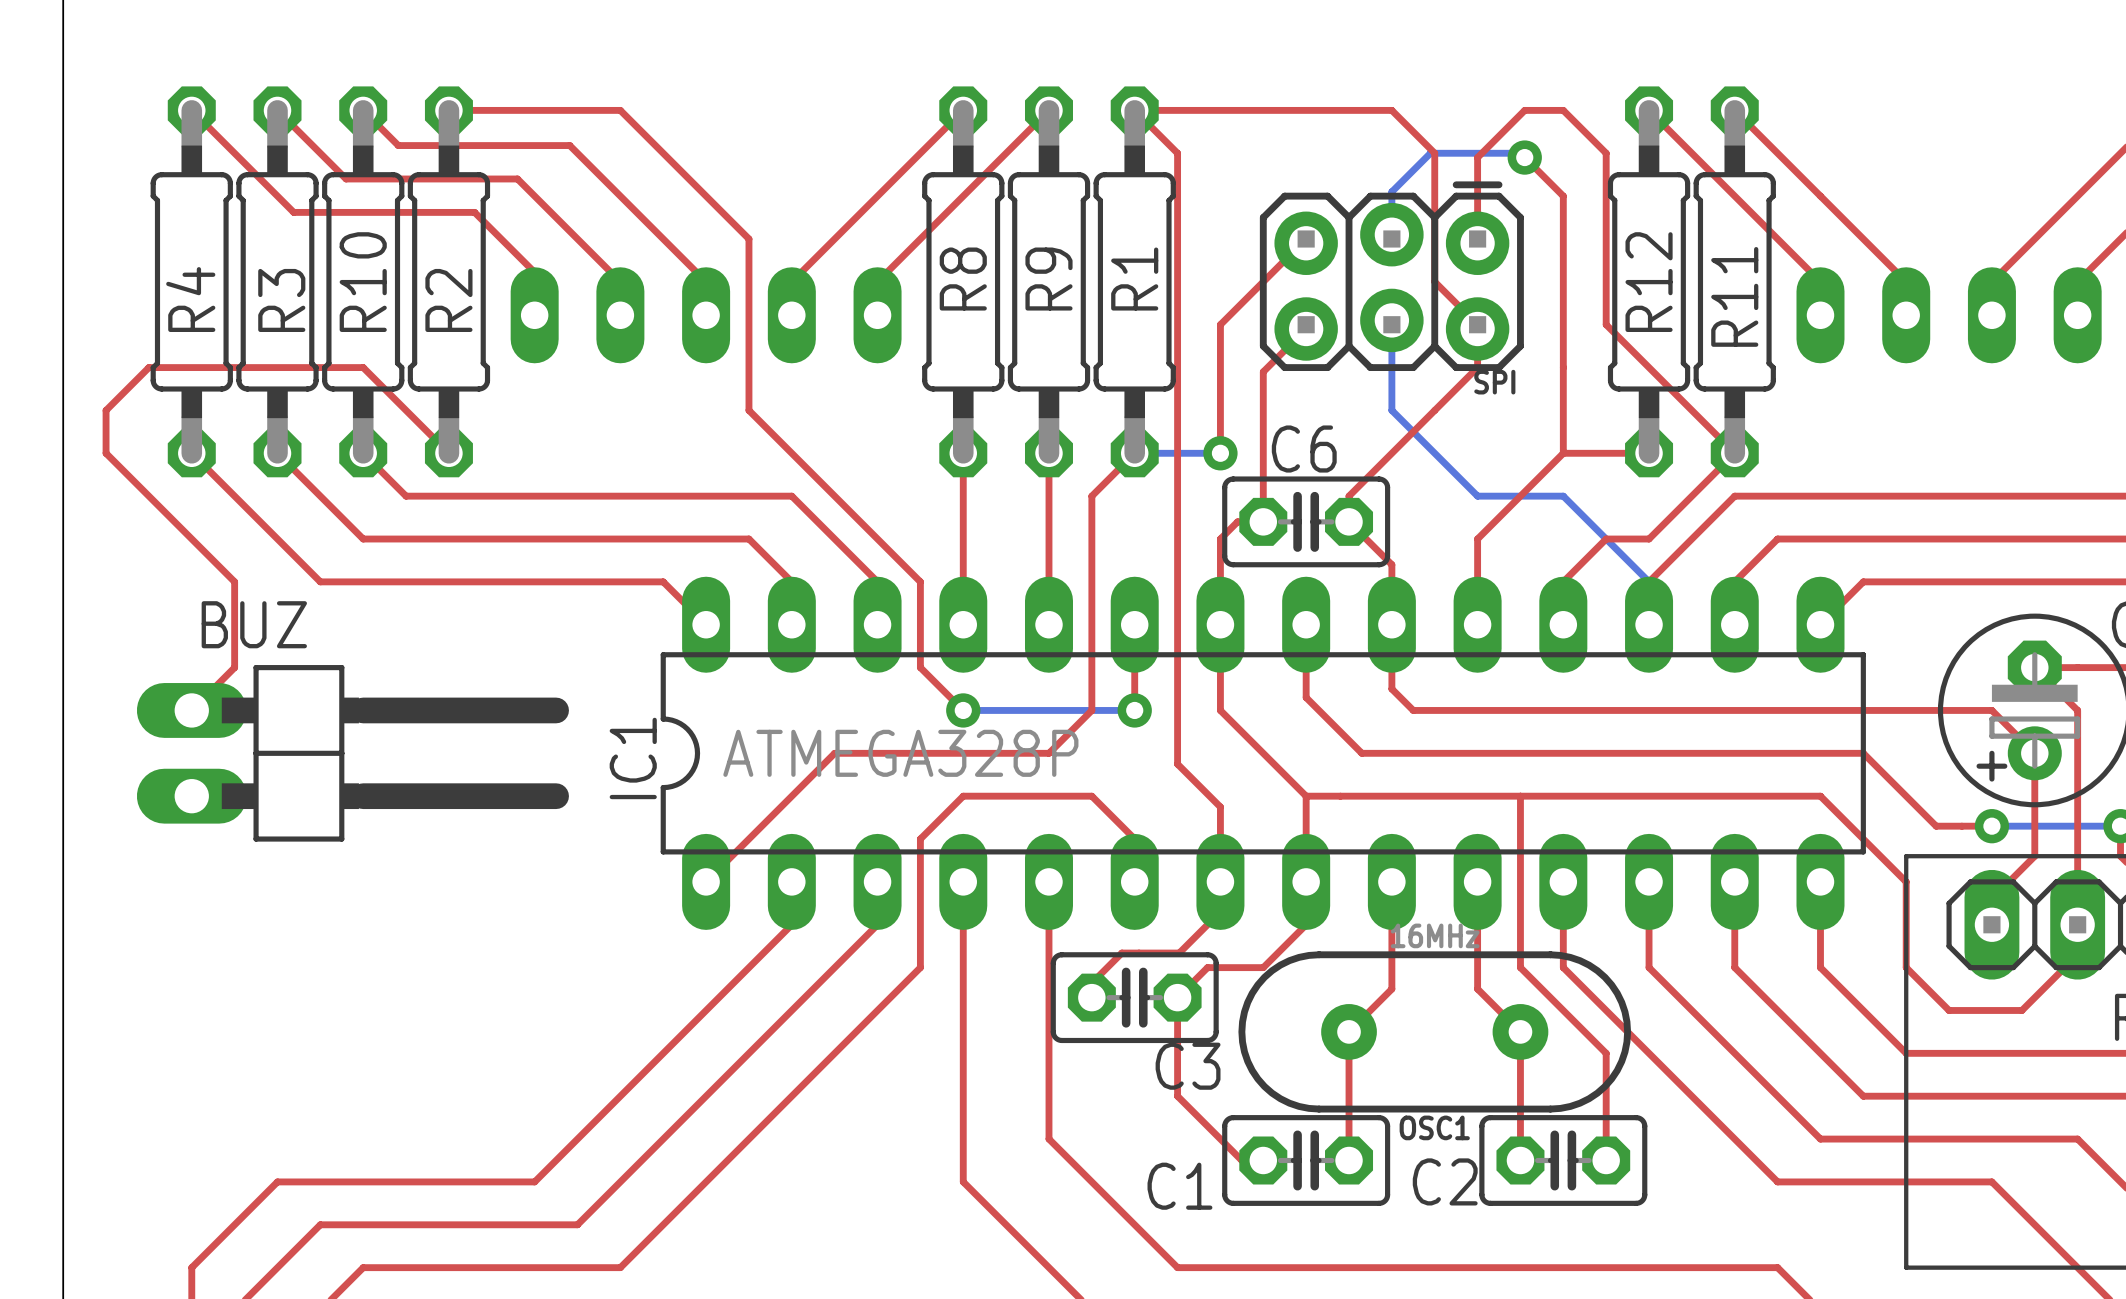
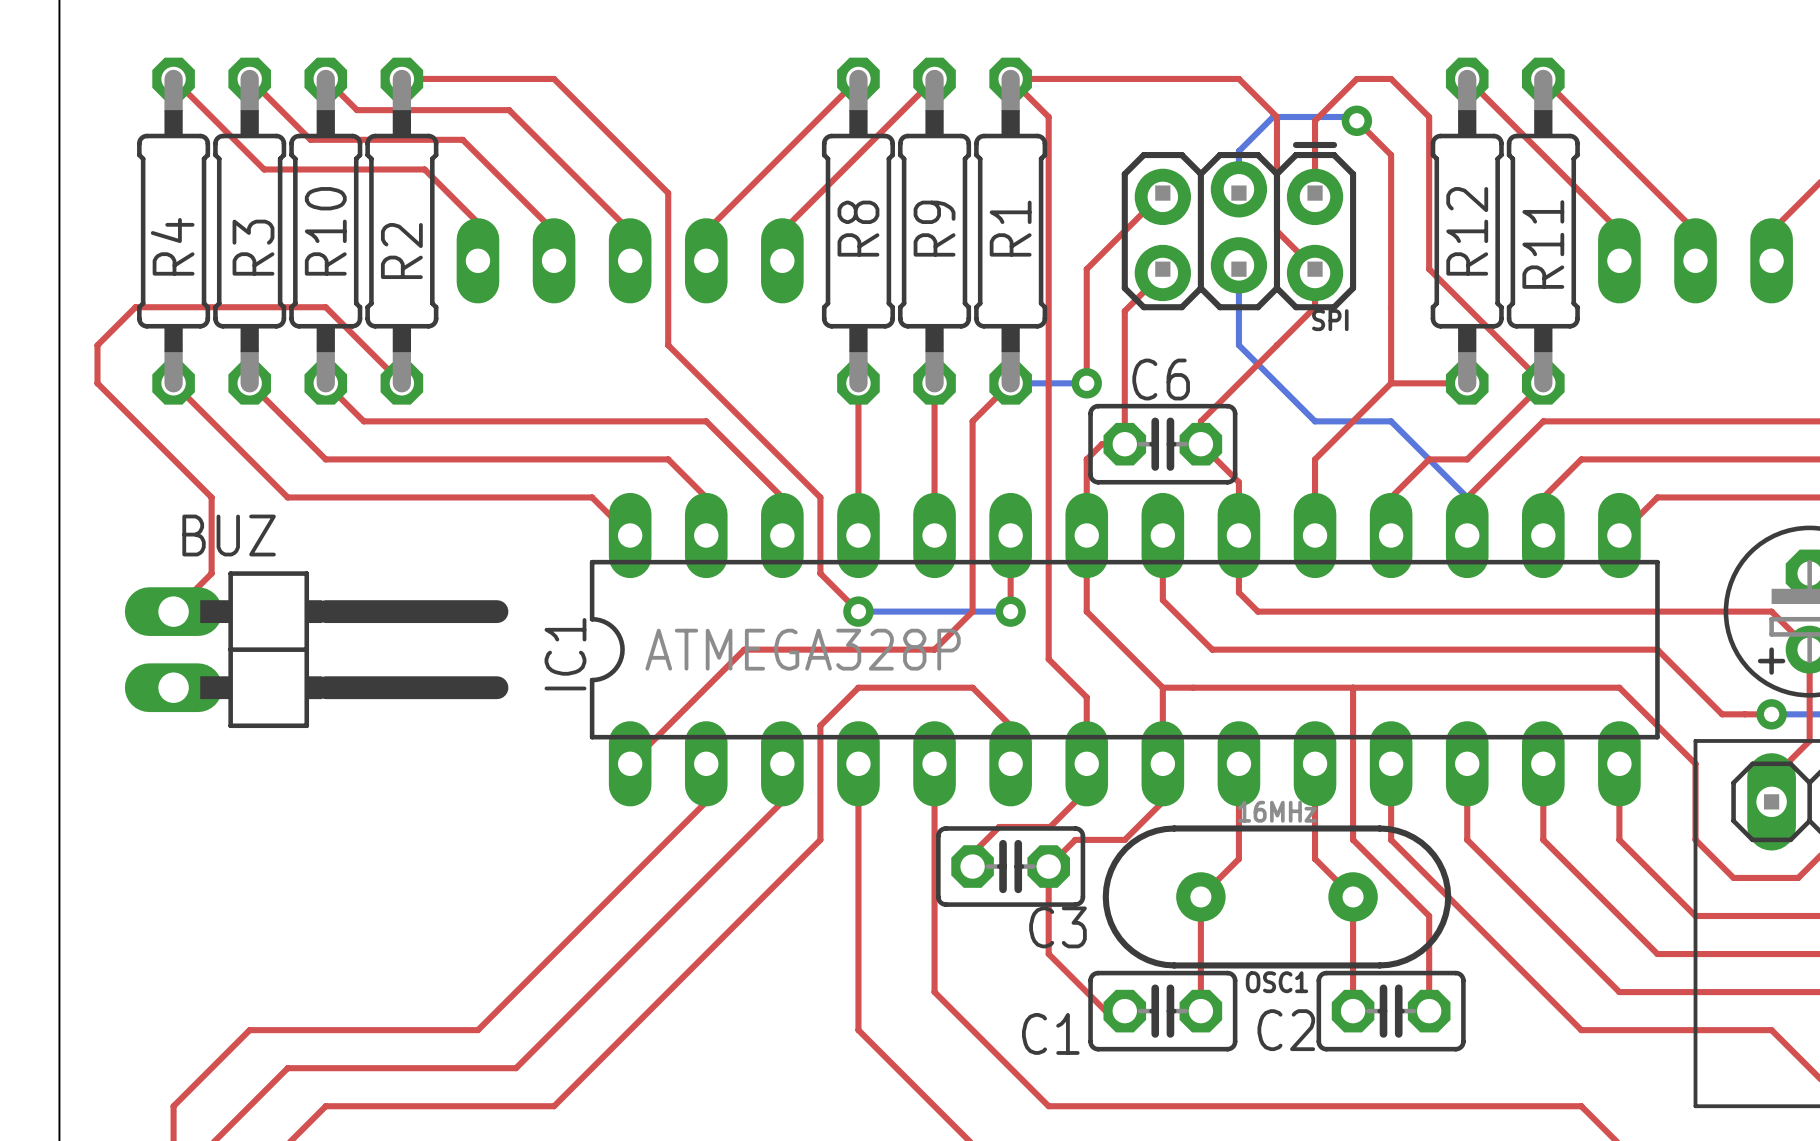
R2 name position: R2 (448, 300) -> R2 (401, 251)

